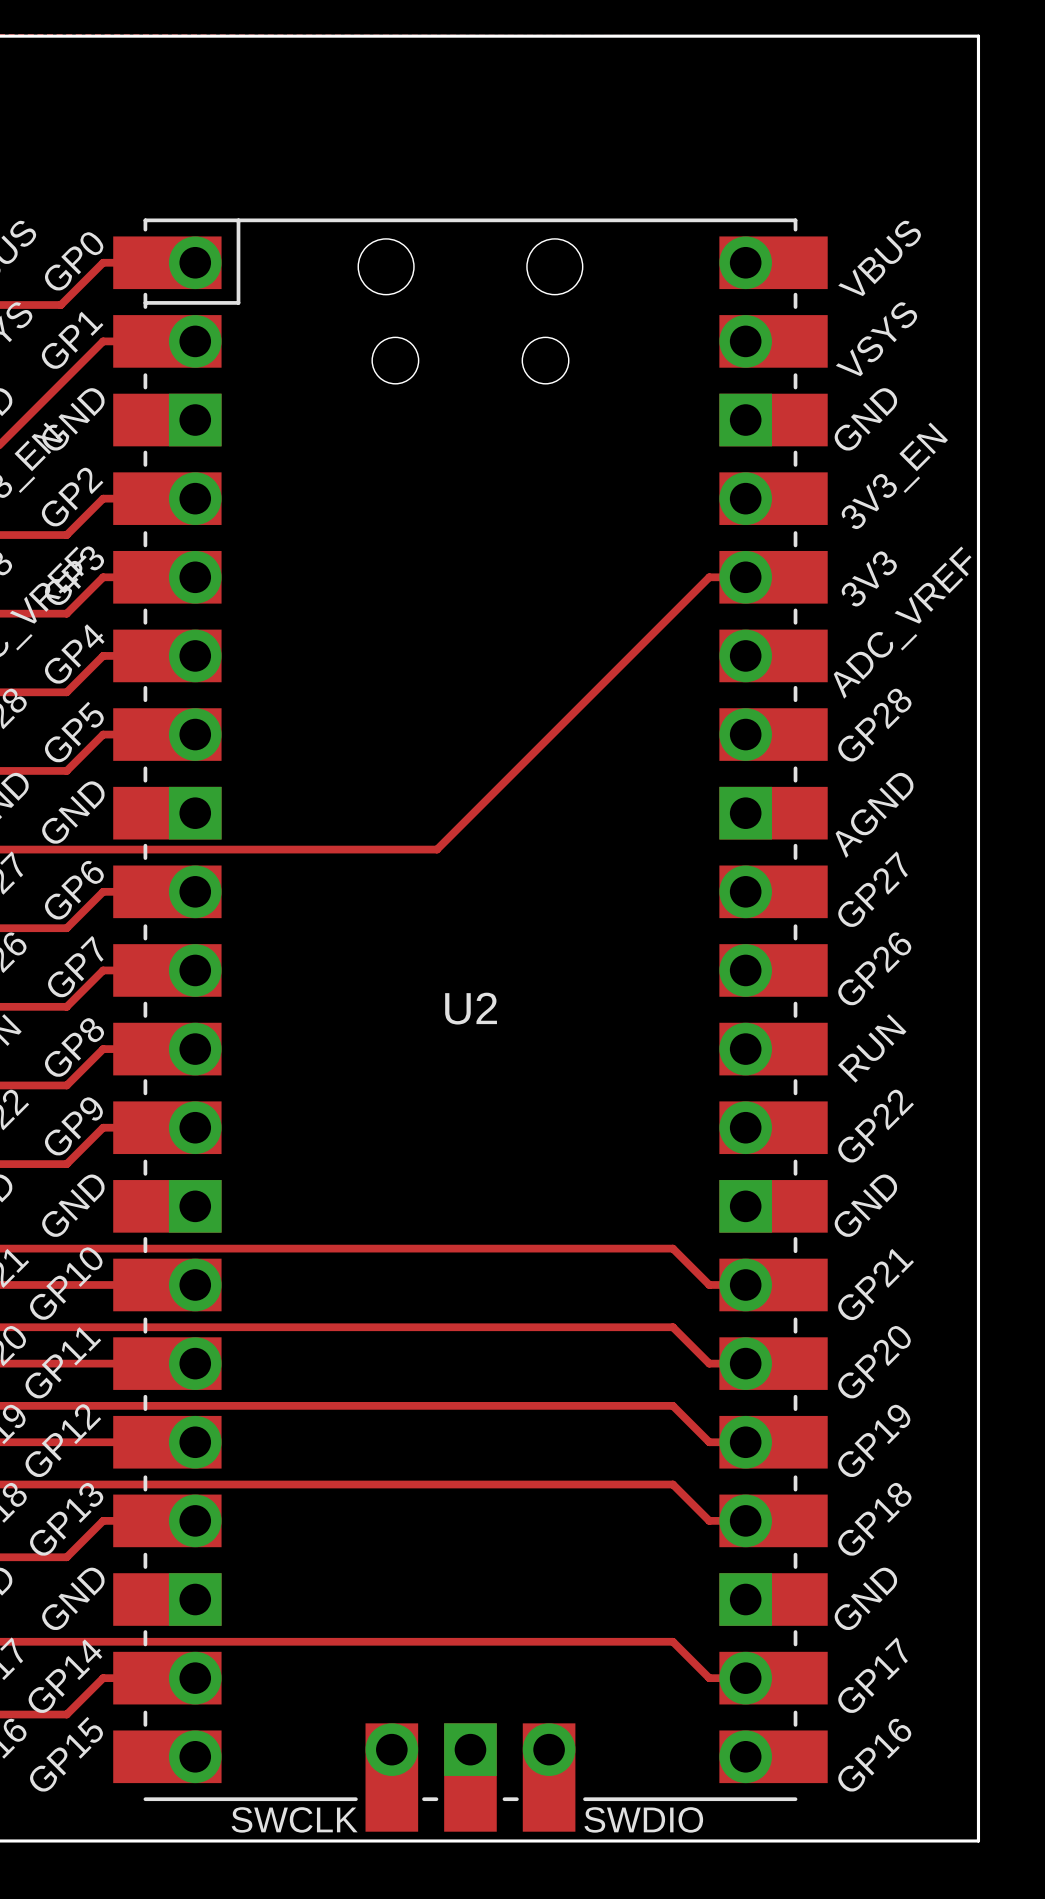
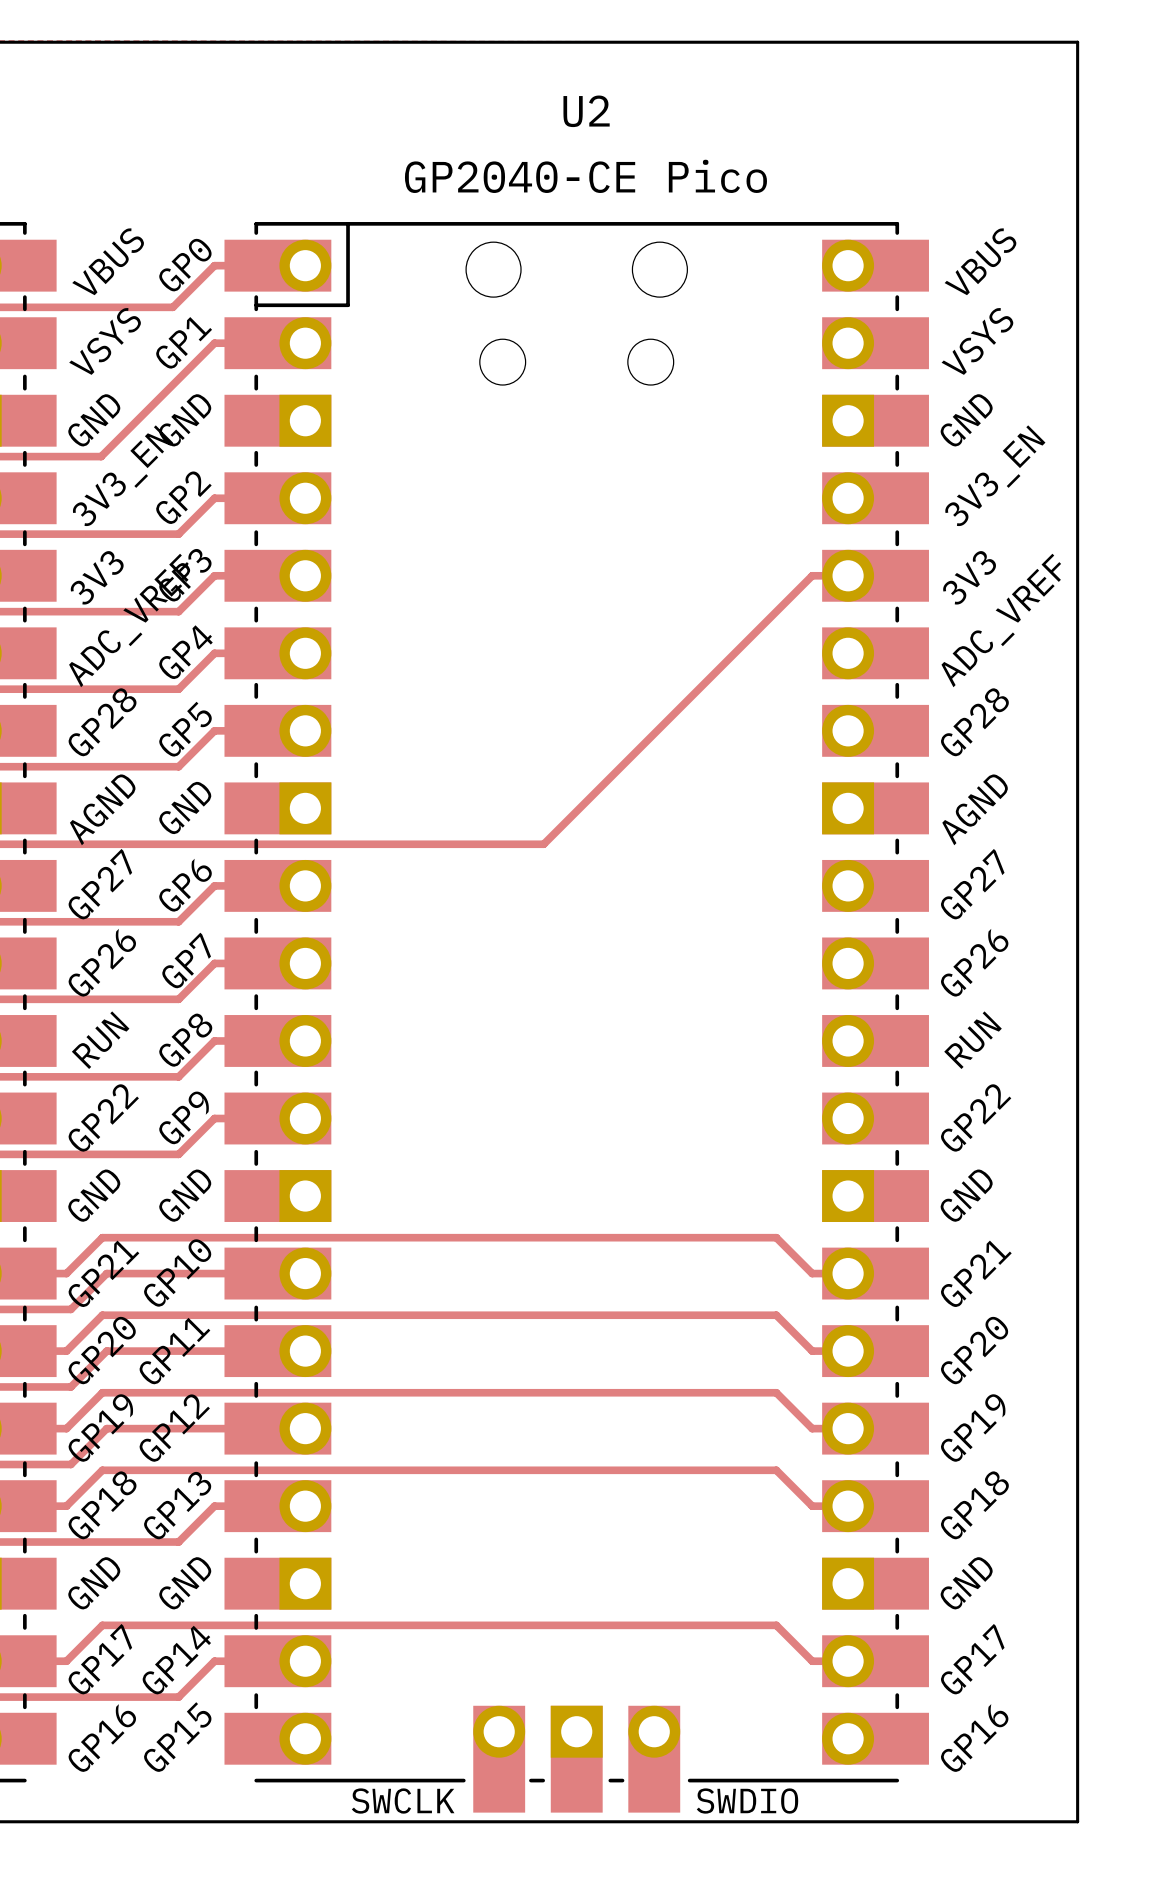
U2 value: none -> GP2040-CE Pico (585, 176)
U2 name position: U2 (471, 1008) -> U2 (586, 111)

